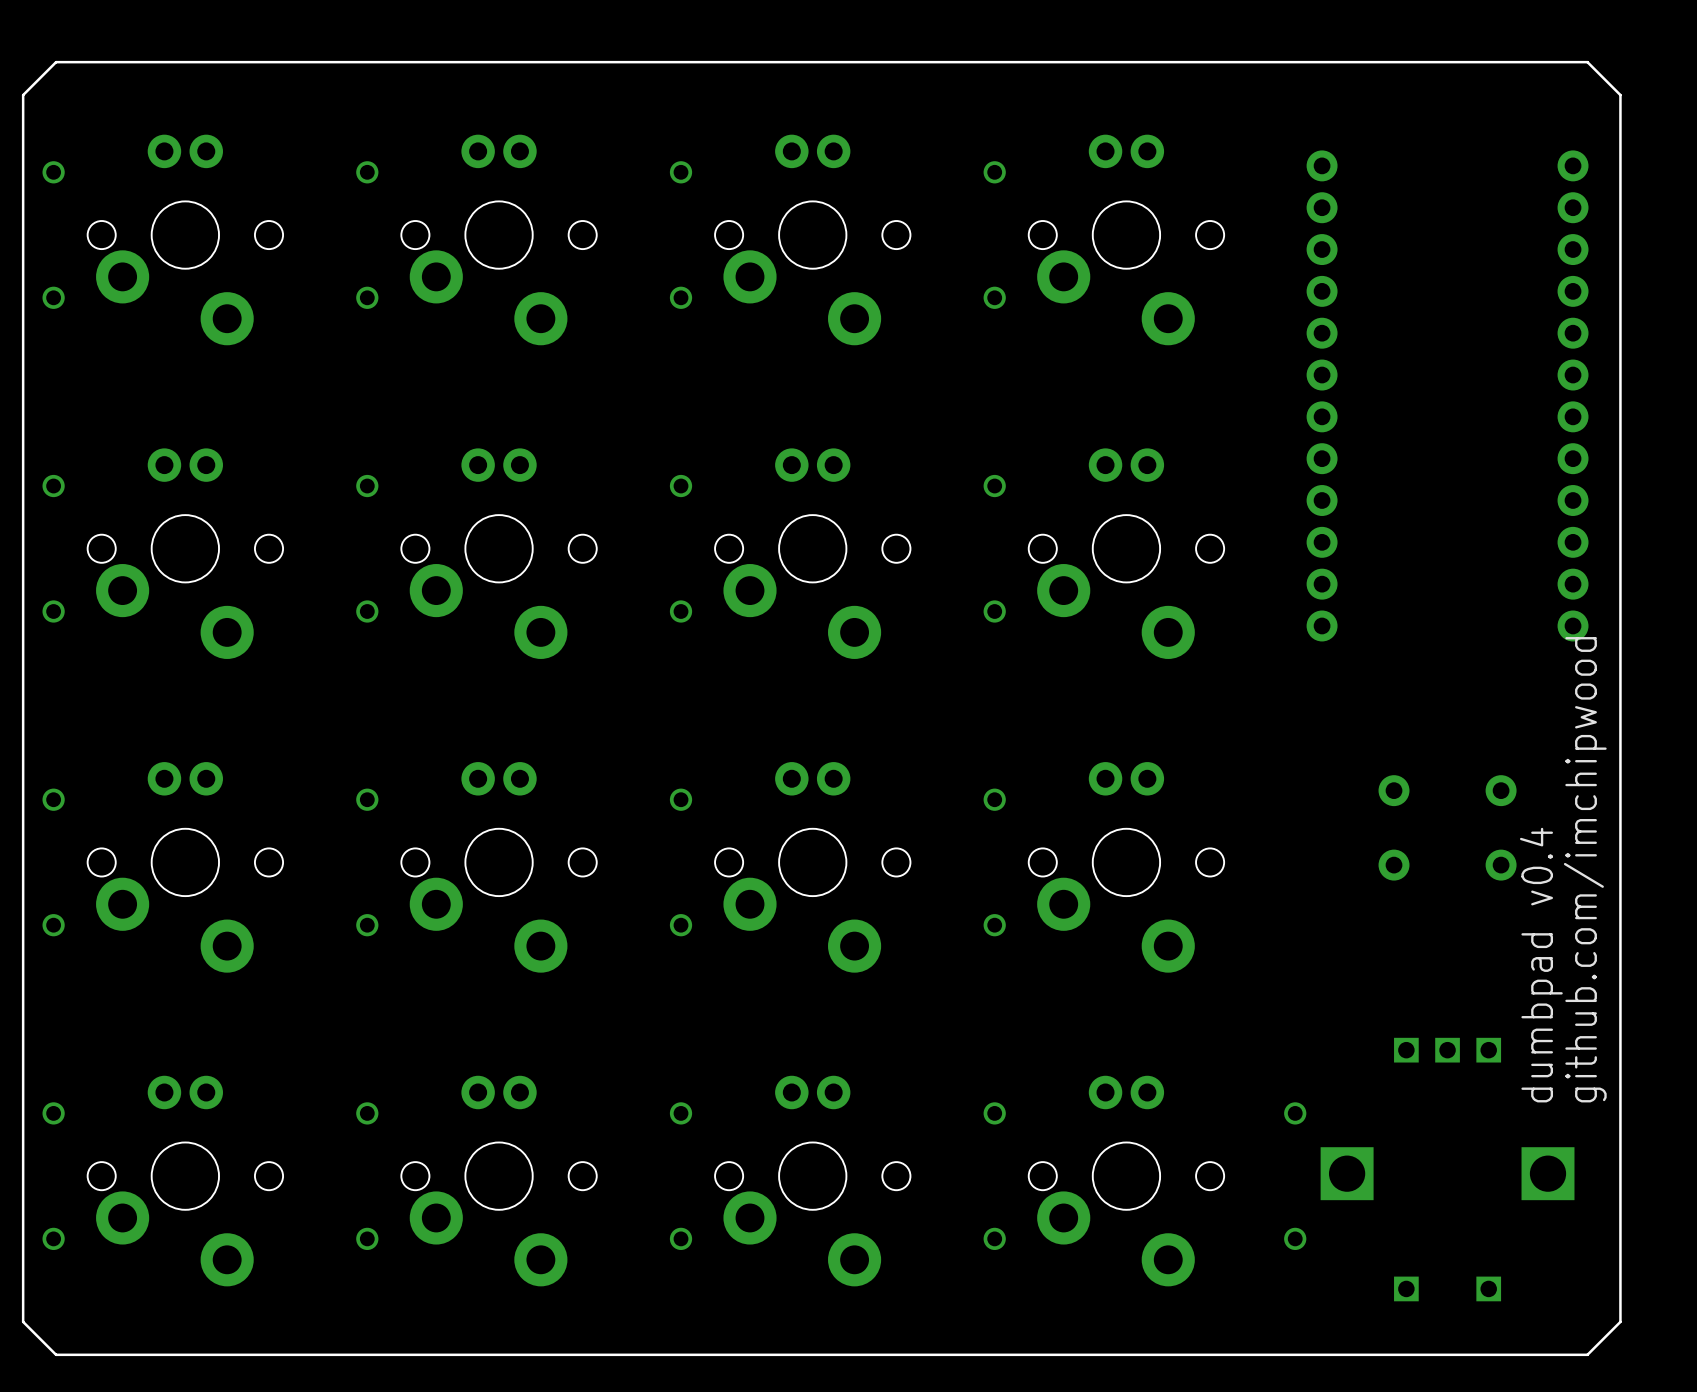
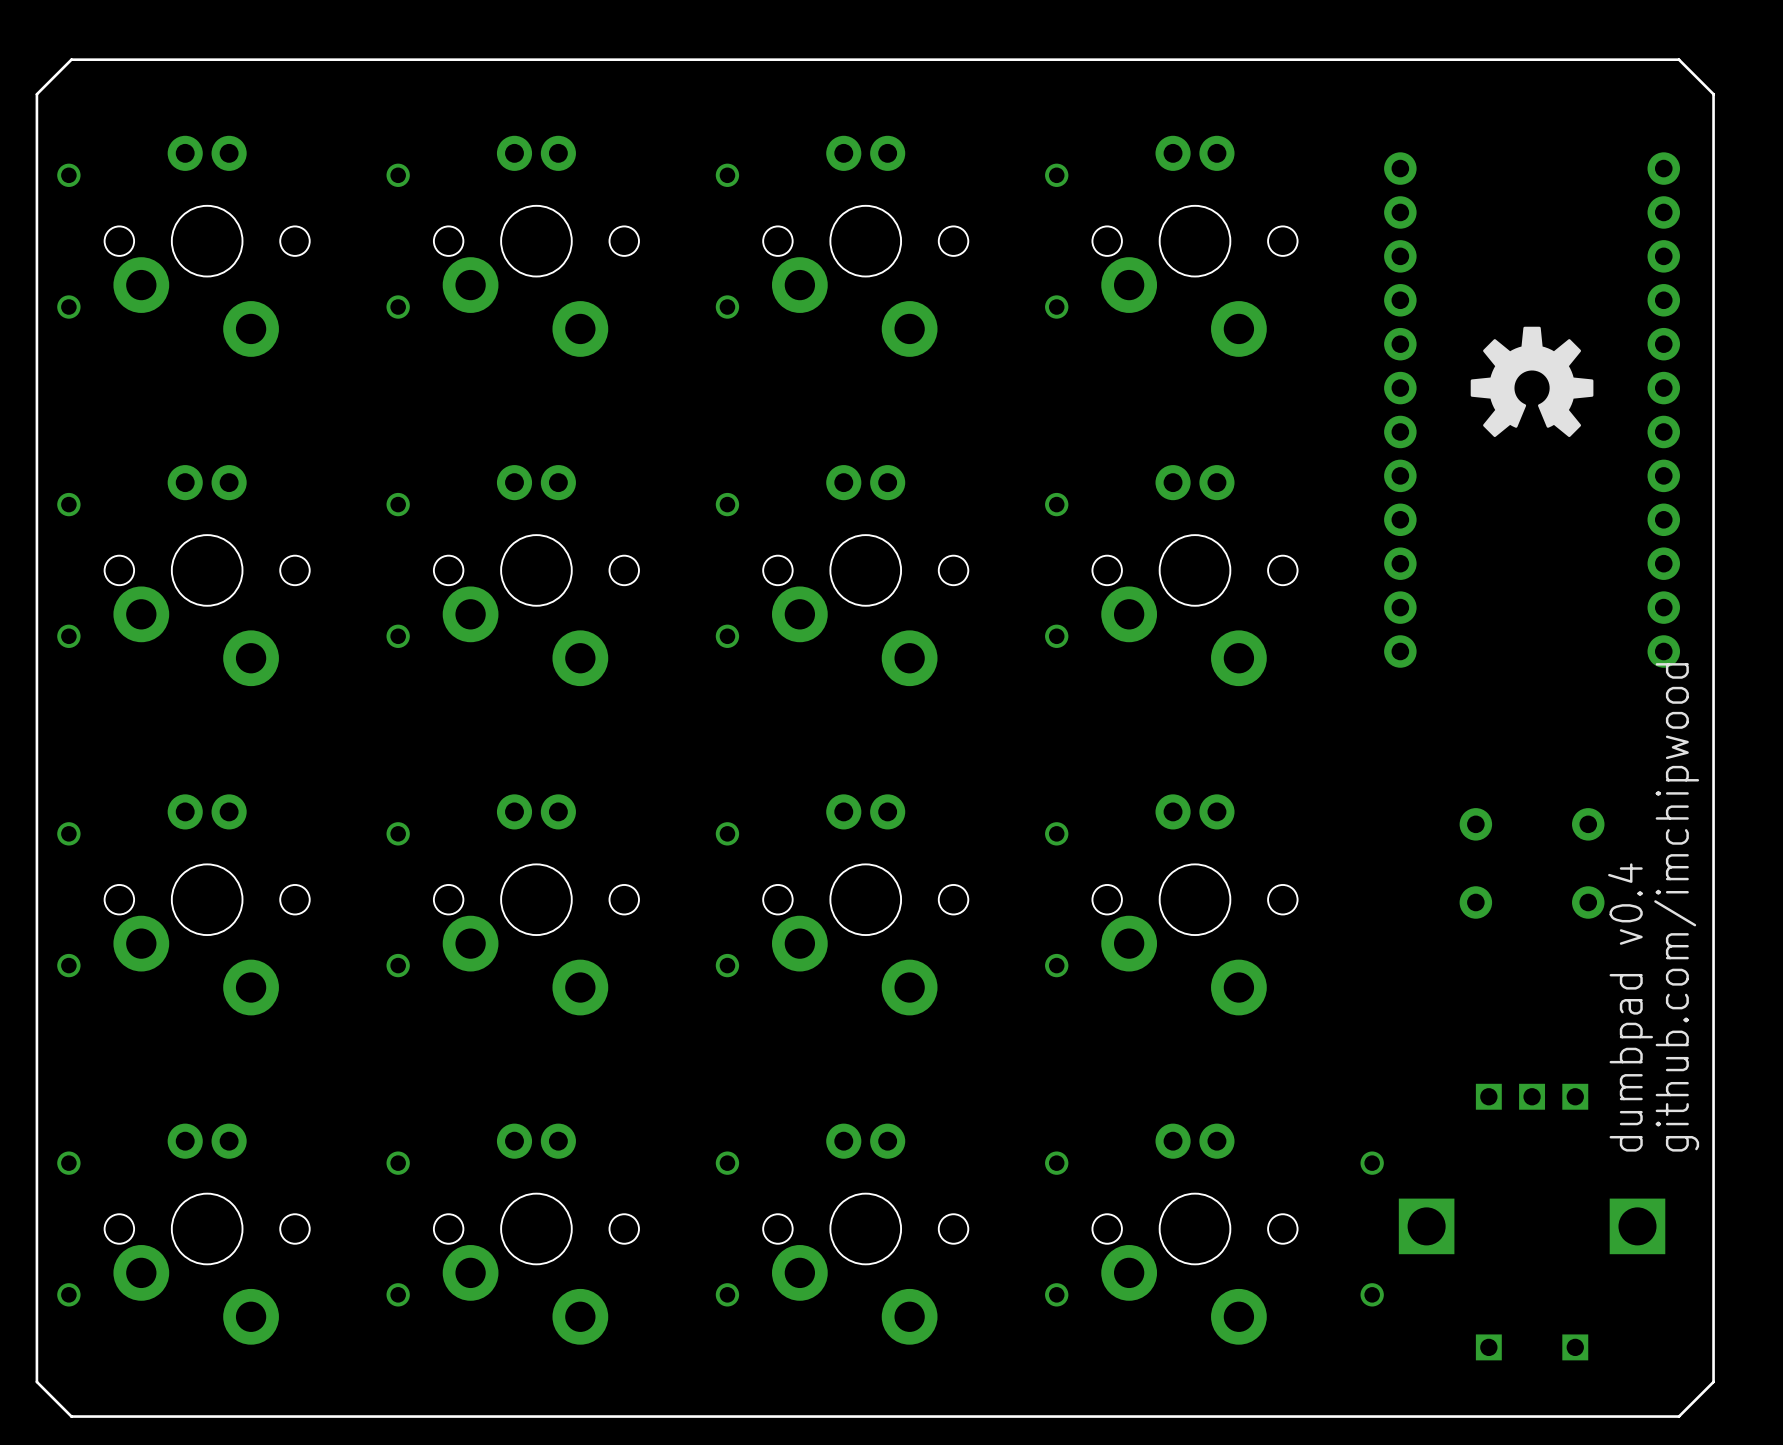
drawing: none -> [1470, 326, 1594, 438]

